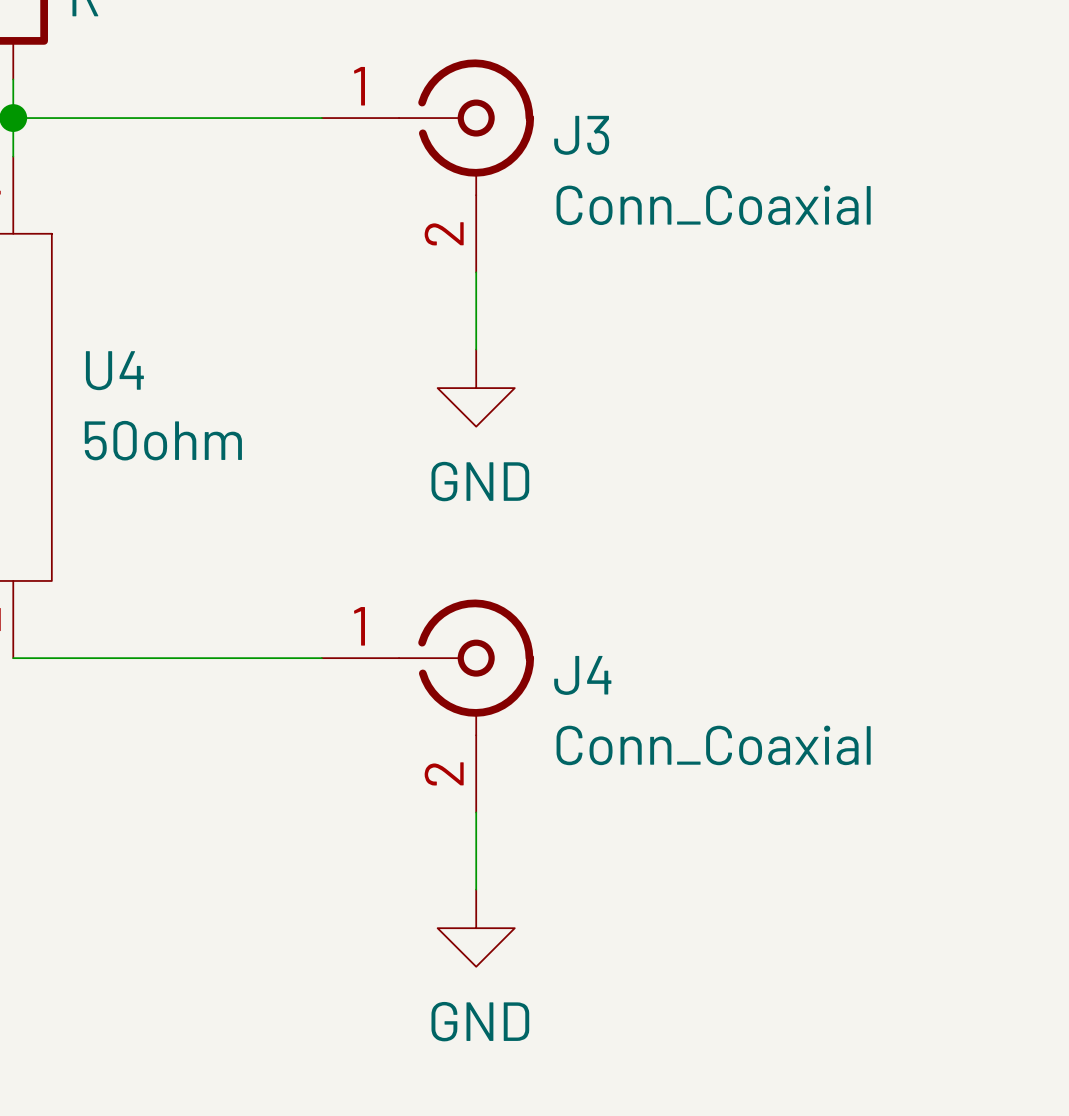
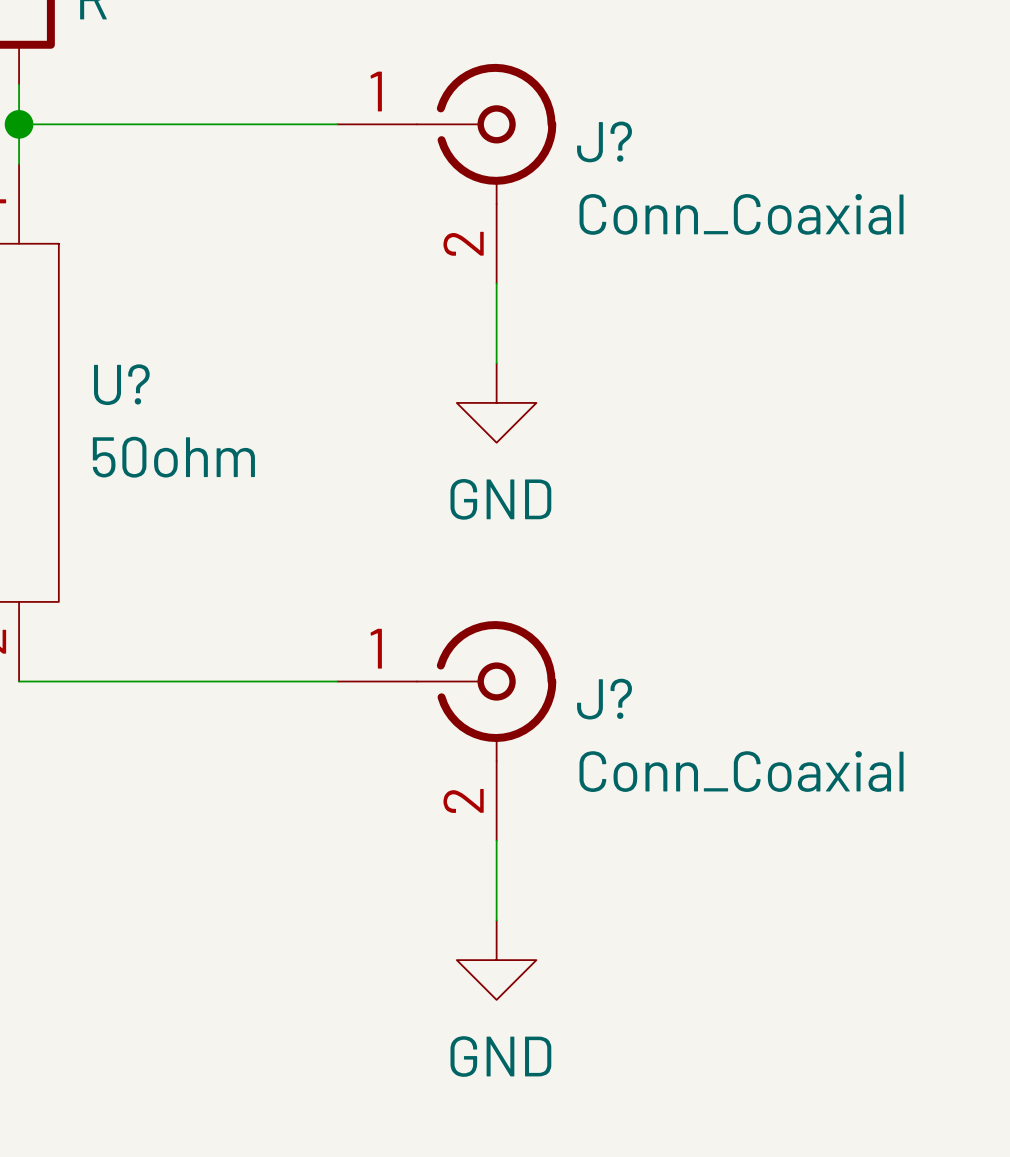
J3 name: J3 (581, 135) -> J? (604, 141)
U4 name: U4 (114, 370) -> U? (121, 384)
J4 name: J4 (582, 675) -> J? (604, 699)

